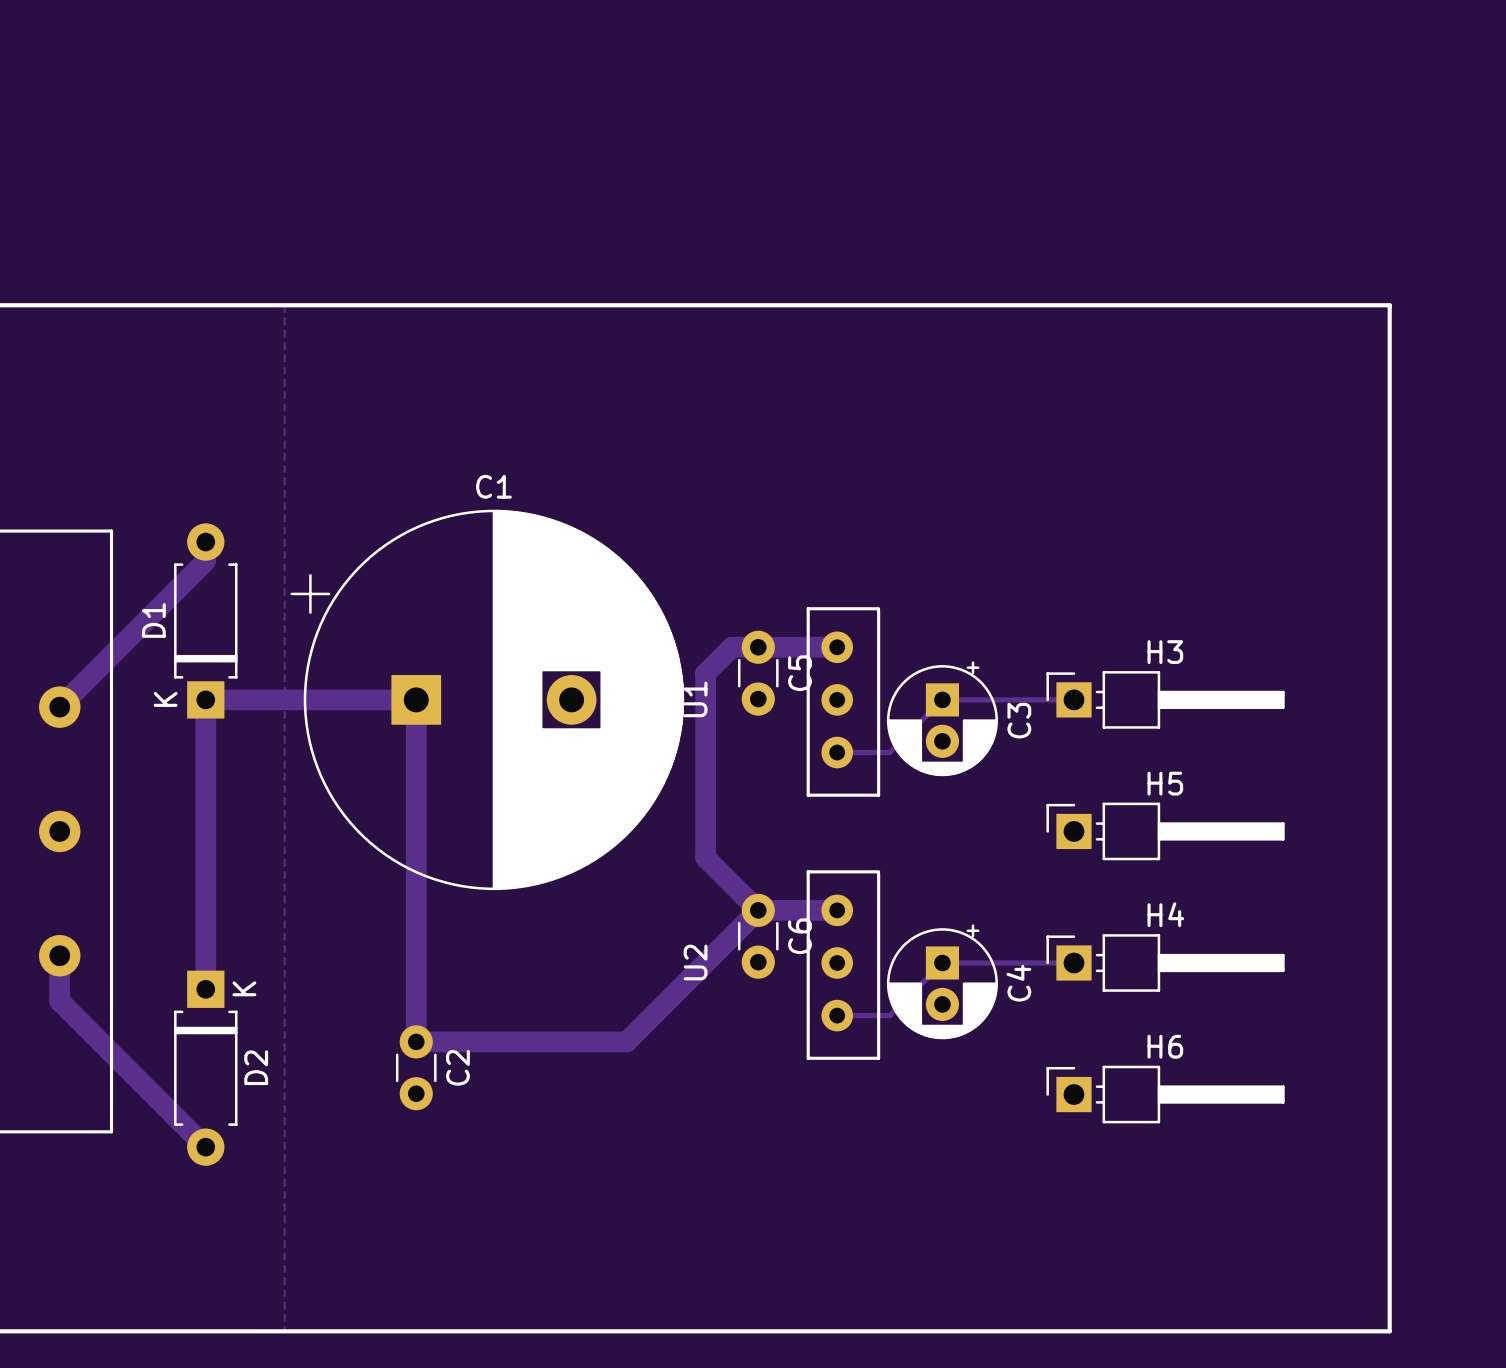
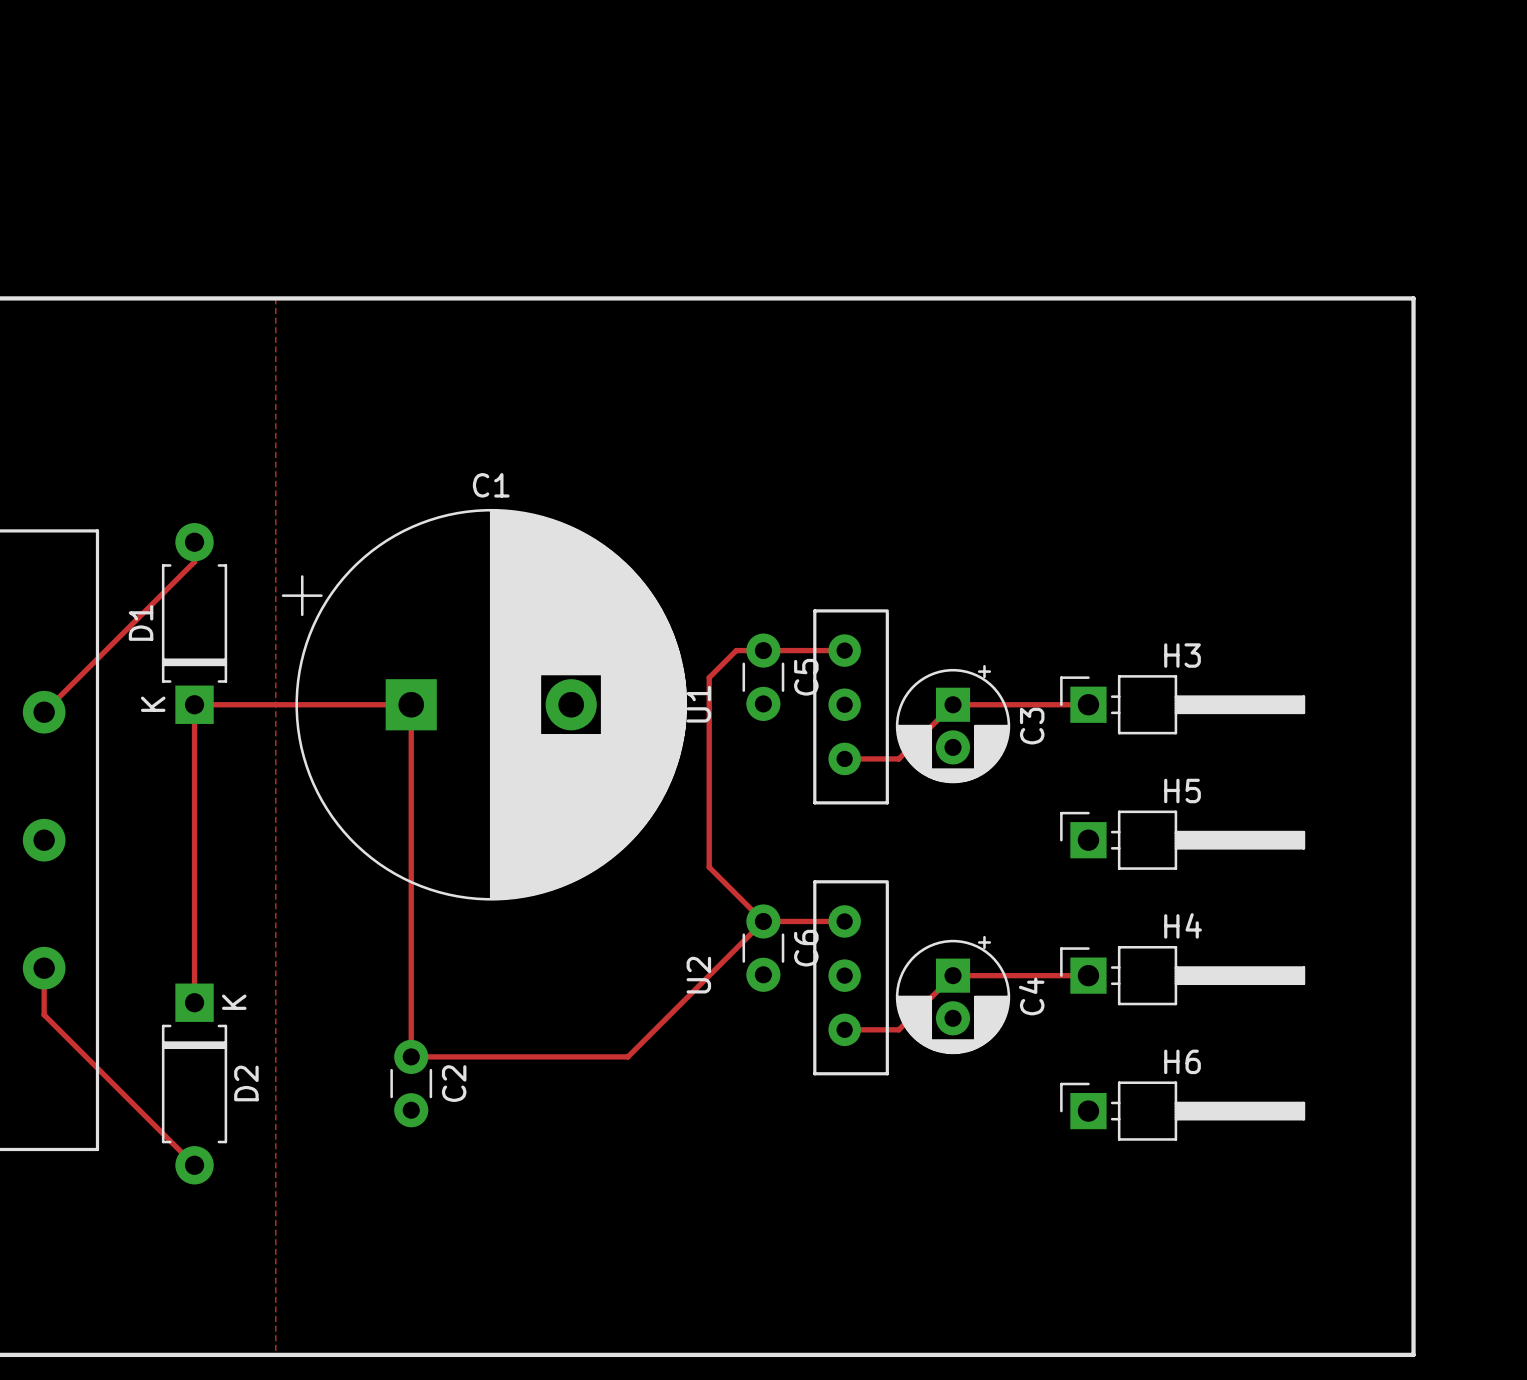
track width: thick (205, 561) (59, 707) -> thin (194, 561) (44, 712)
track width: thick (837, 647) (731, 647) (705, 673) (705, 857) (758, 910) -> thin (844, 650) (736, 650) (709, 677) (709, 867) (763, 921)
track width: thick (758, 910) (626, 1041) (416, 1041) (416, 699) (205, 699) (205, 989) -> thin (763, 921) (627, 1056) (411, 1056) (411, 704) (194, 704) (194, 1002)
track width: thick (758, 910) (837, 910) -> thin (763, 921) (844, 921)
track width: thick (59, 955) (59, 1001) (205, 1147) -> thin (44, 968) (44, 1014) (194, 1165)

